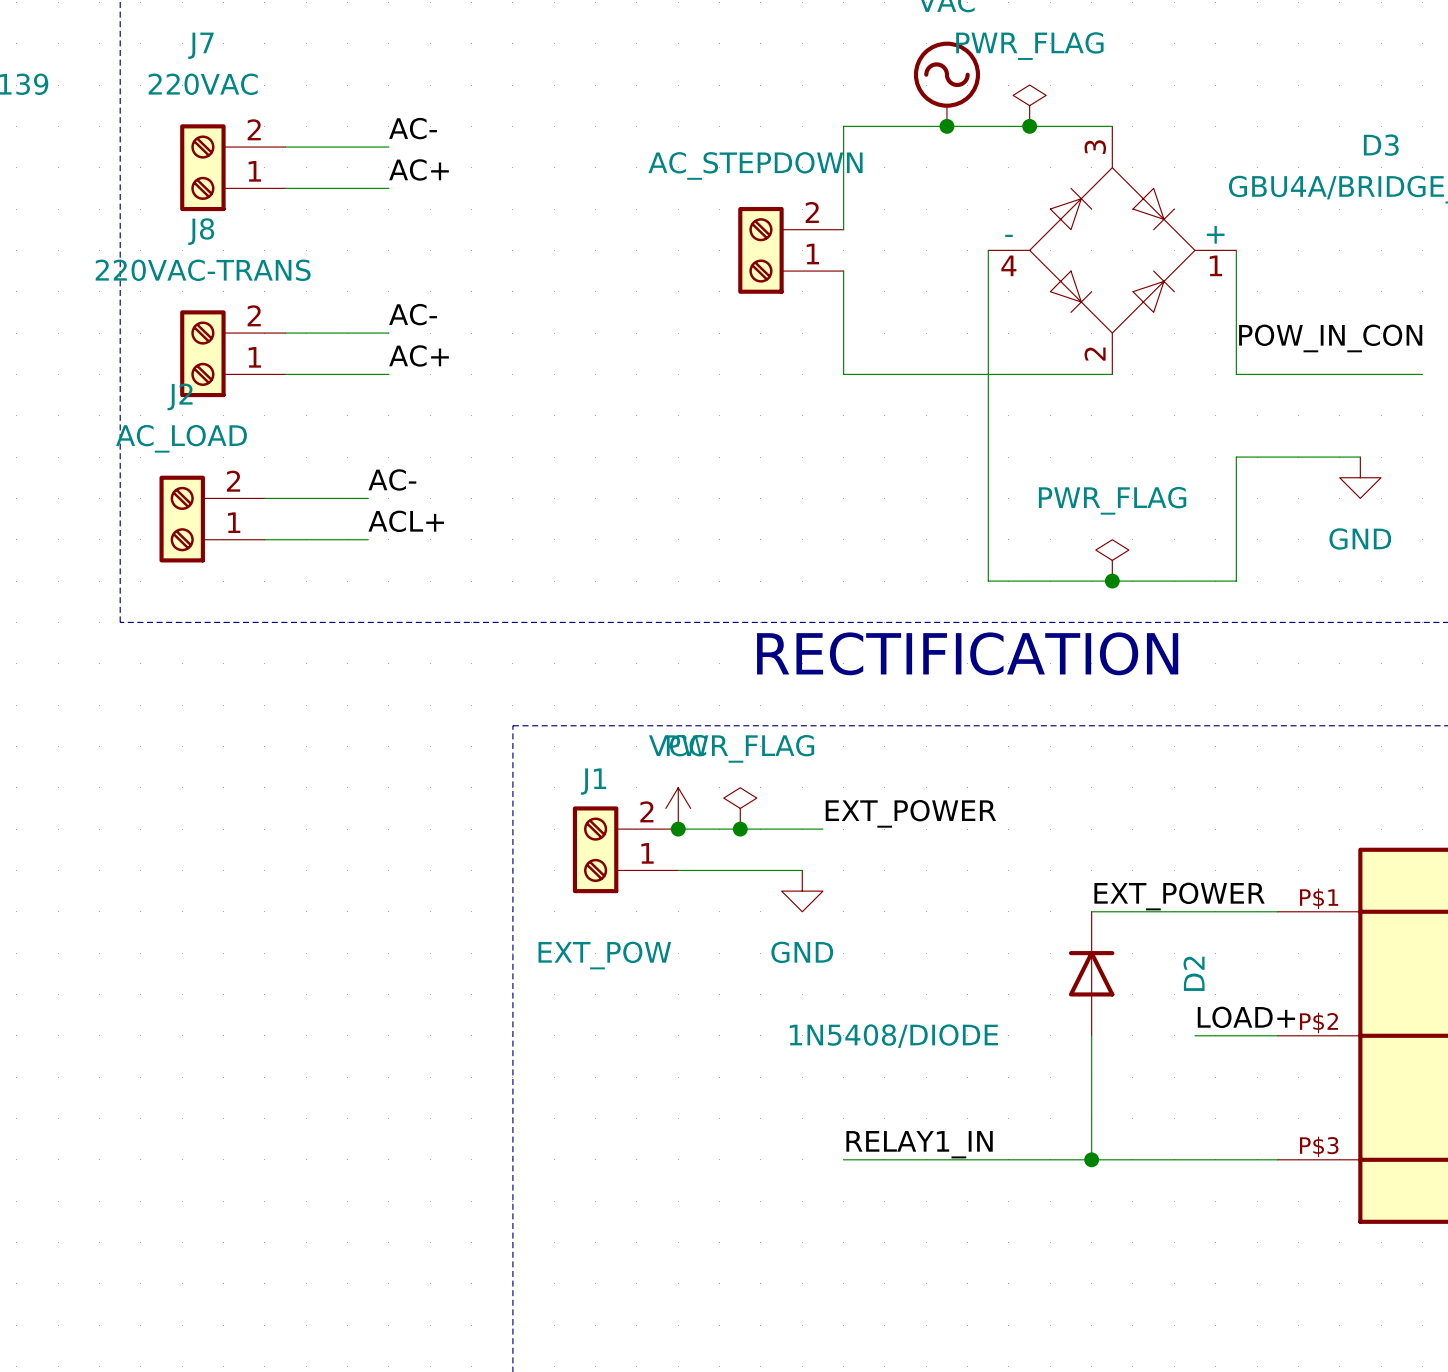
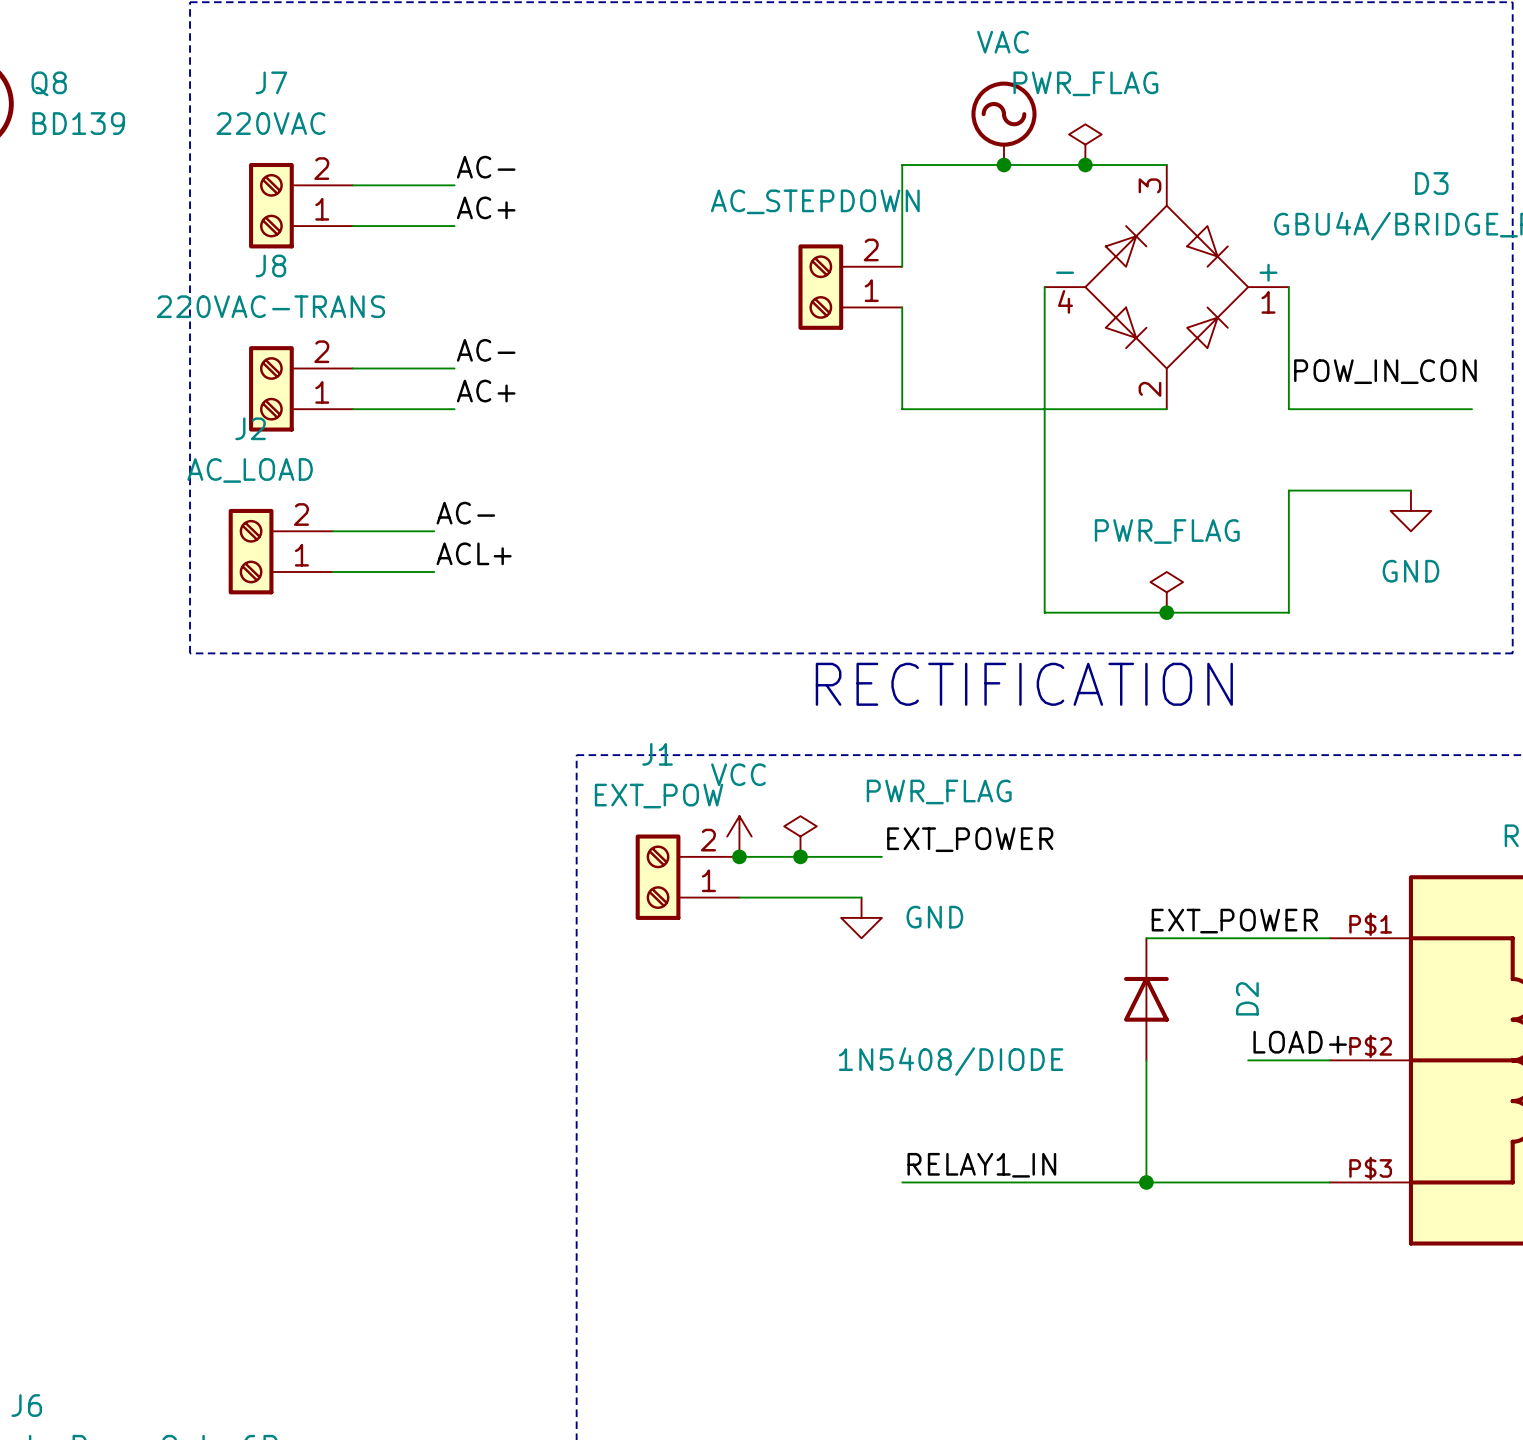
power symbol text position: PWR_FLAG (740, 748) -> PWR_FLAG (939, 791)
J1 name position: J1 (593, 781) -> J1 (657, 754)
power symbol text position: GND (802, 952) -> GND (934, 917)
J1 value position: EXT_POW (604, 955) -> EXT_POW (659, 796)

